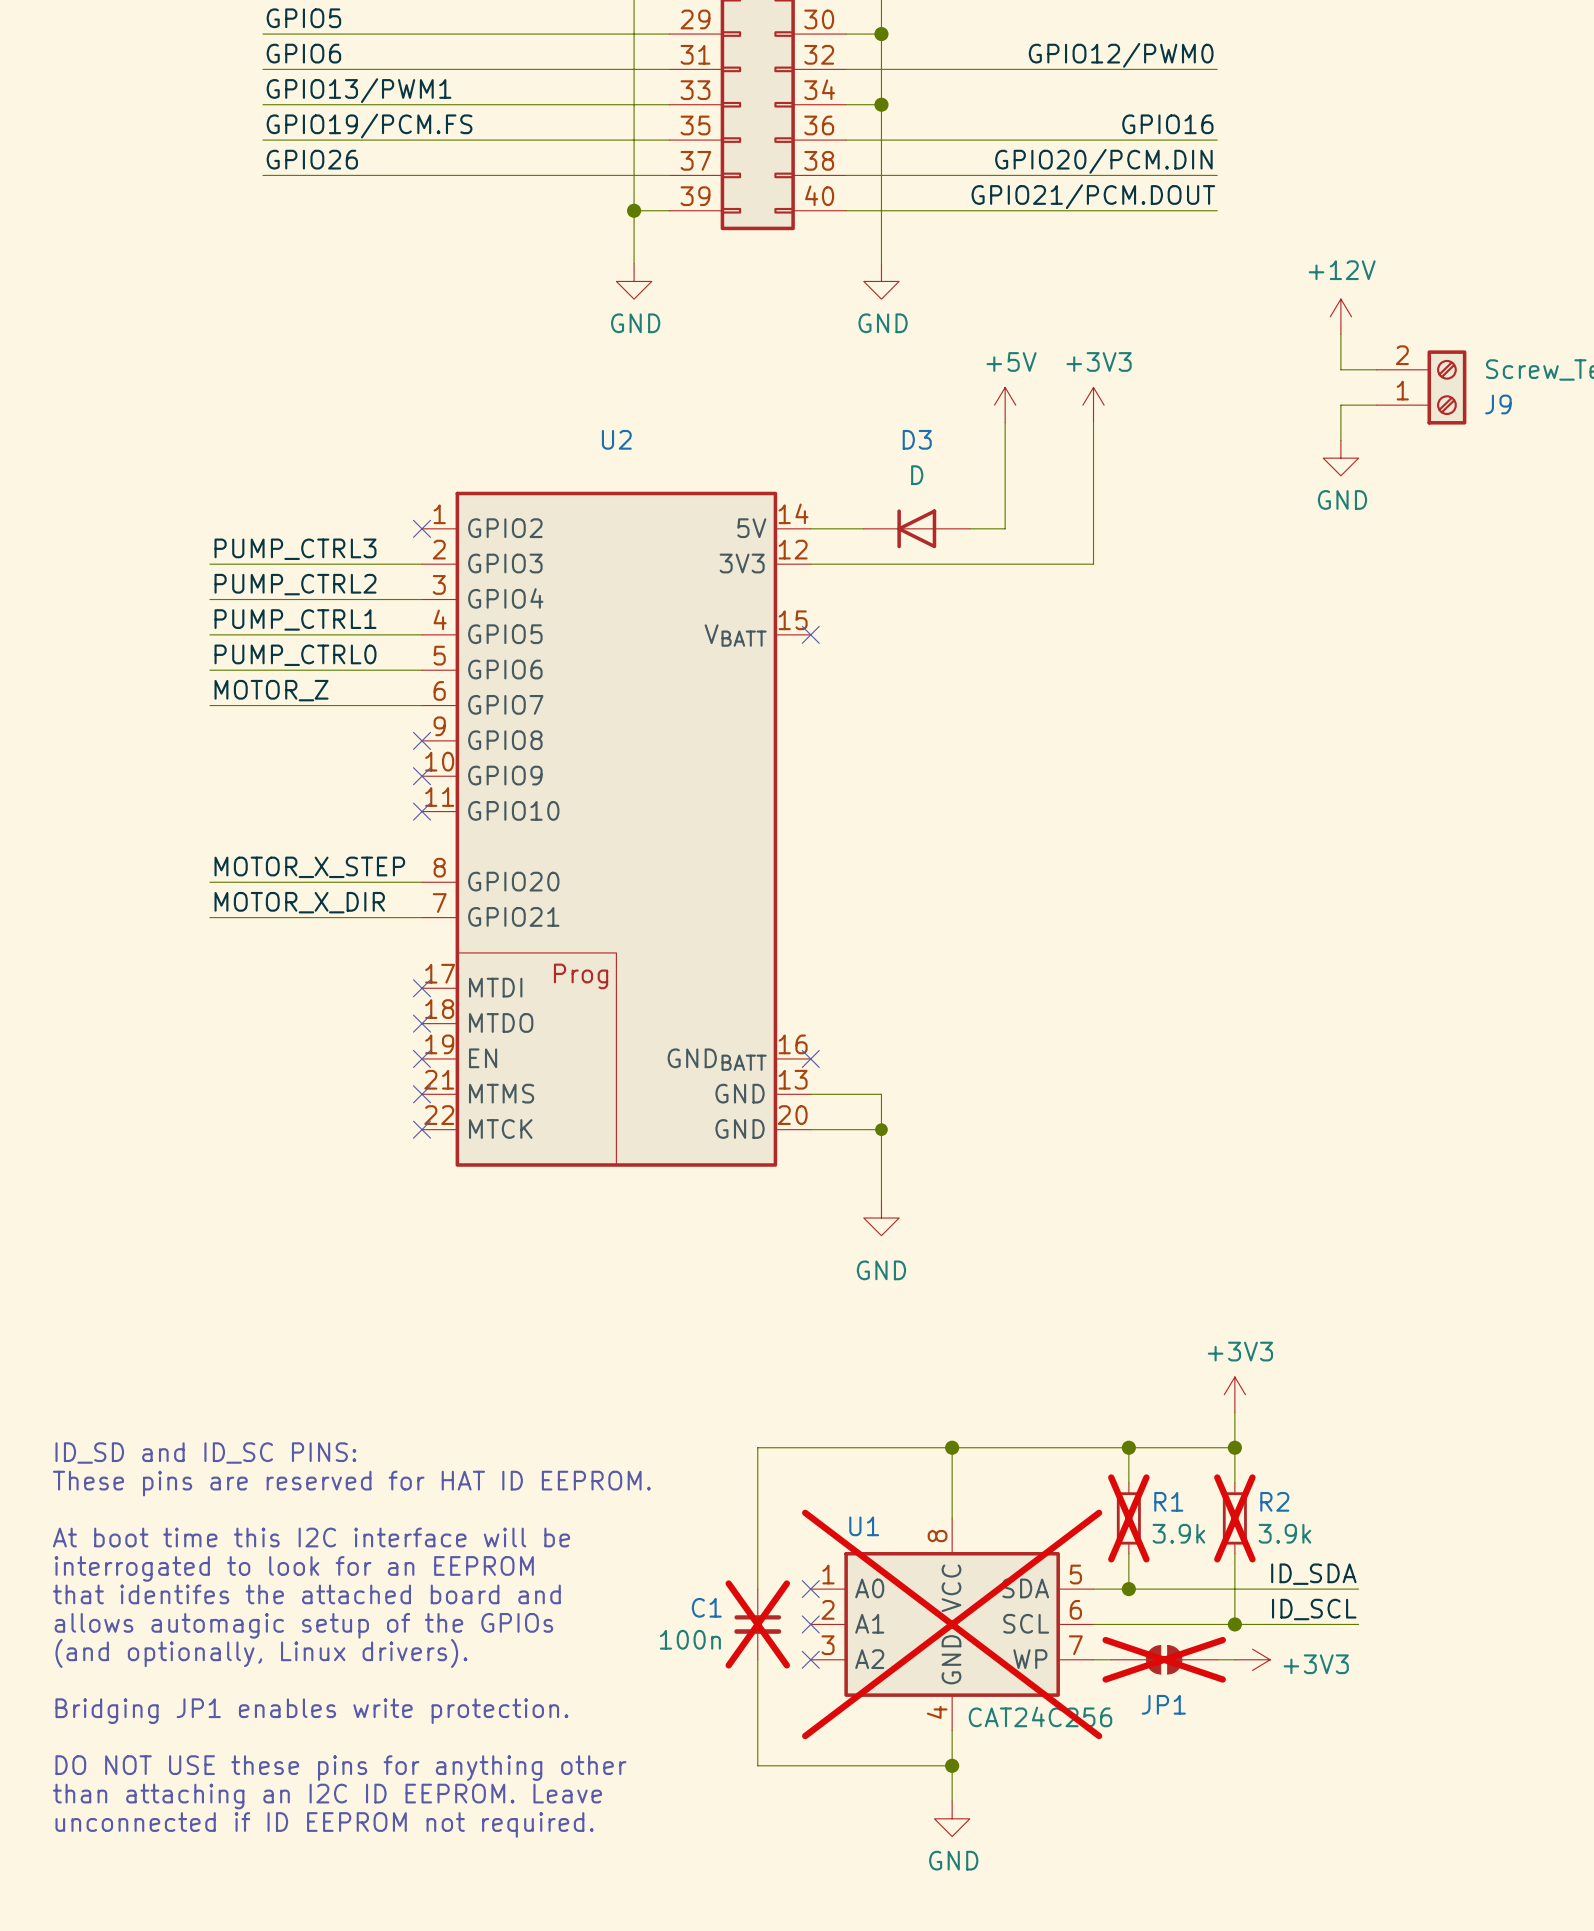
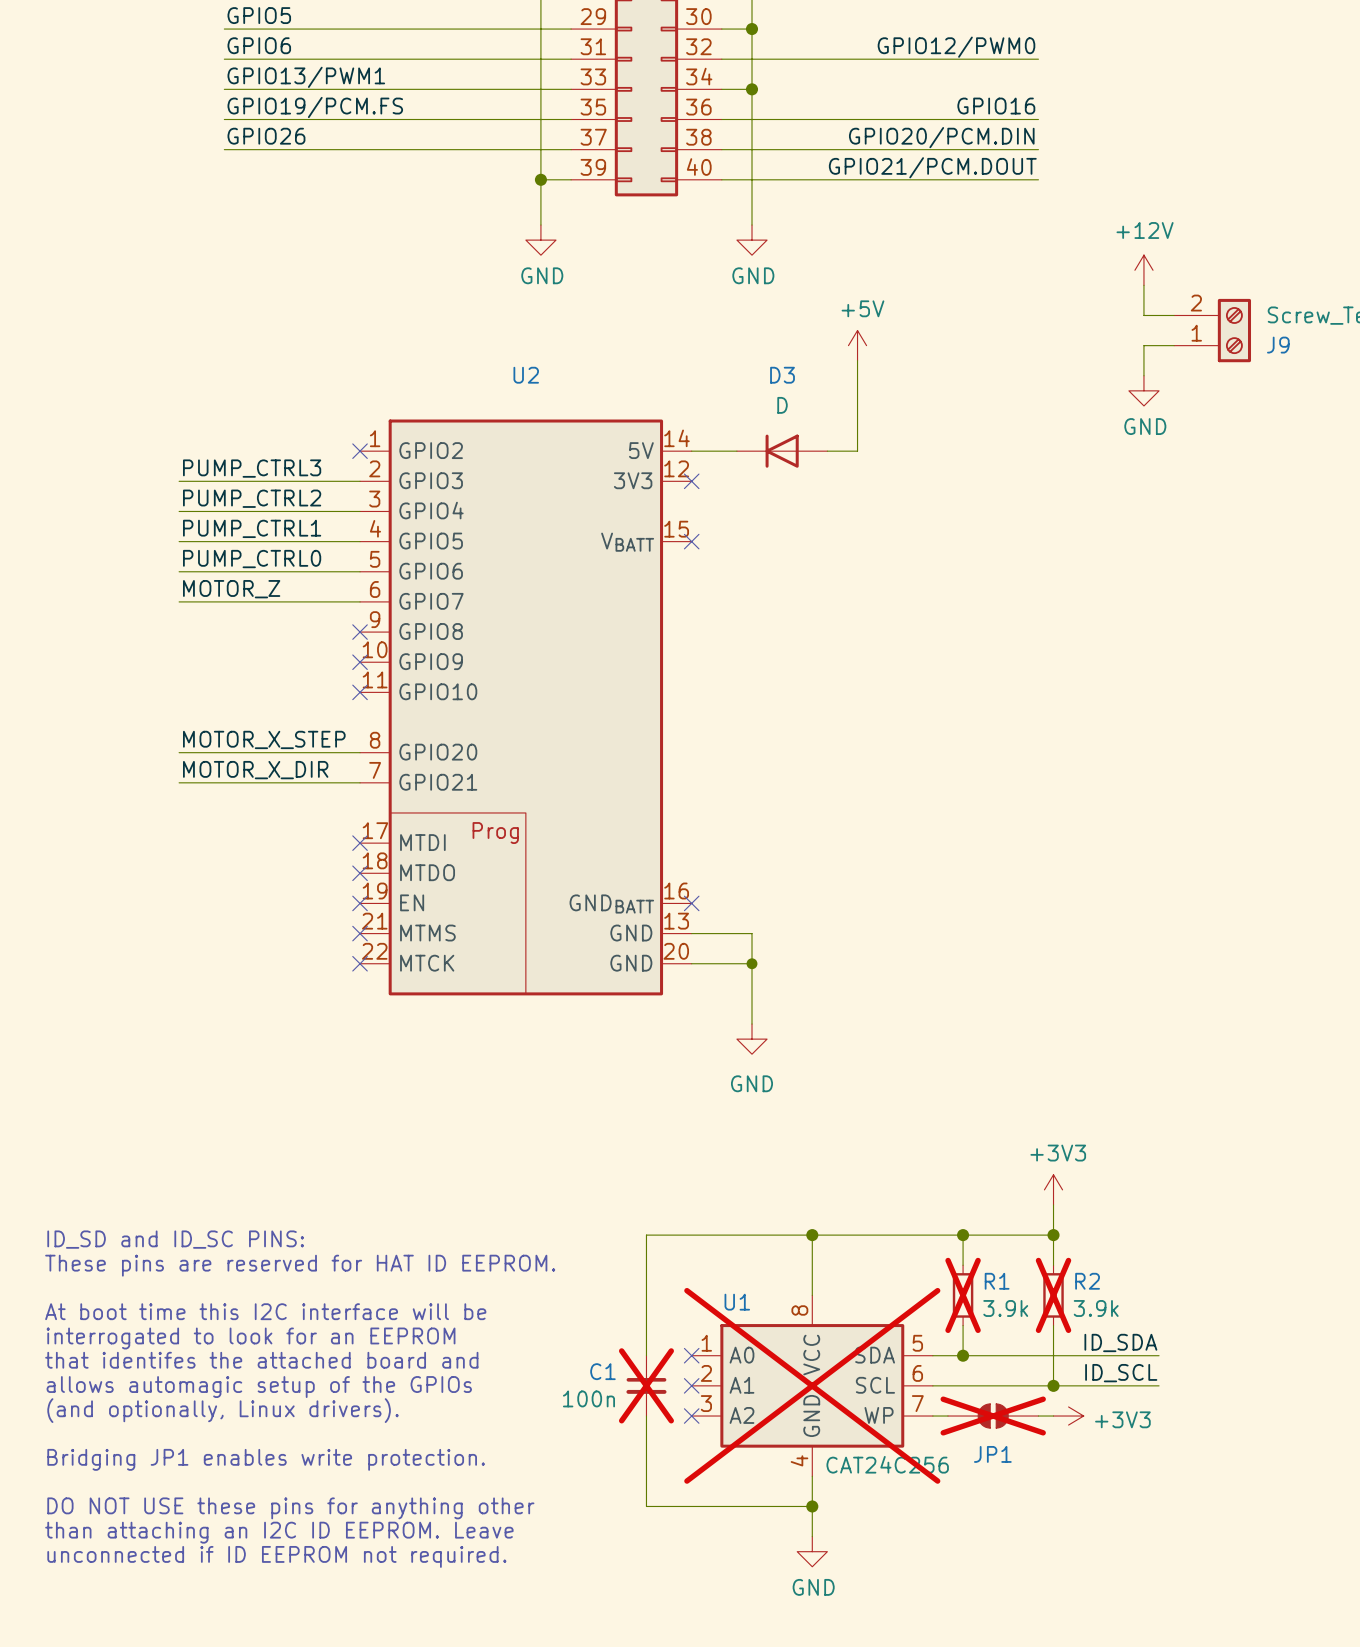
power symbol: +3V3 (1093, 405) -> none
wire: (1093, 422) (1093, 564) (810, 564) -> none
no-connect mark: none -> (691, 481)

